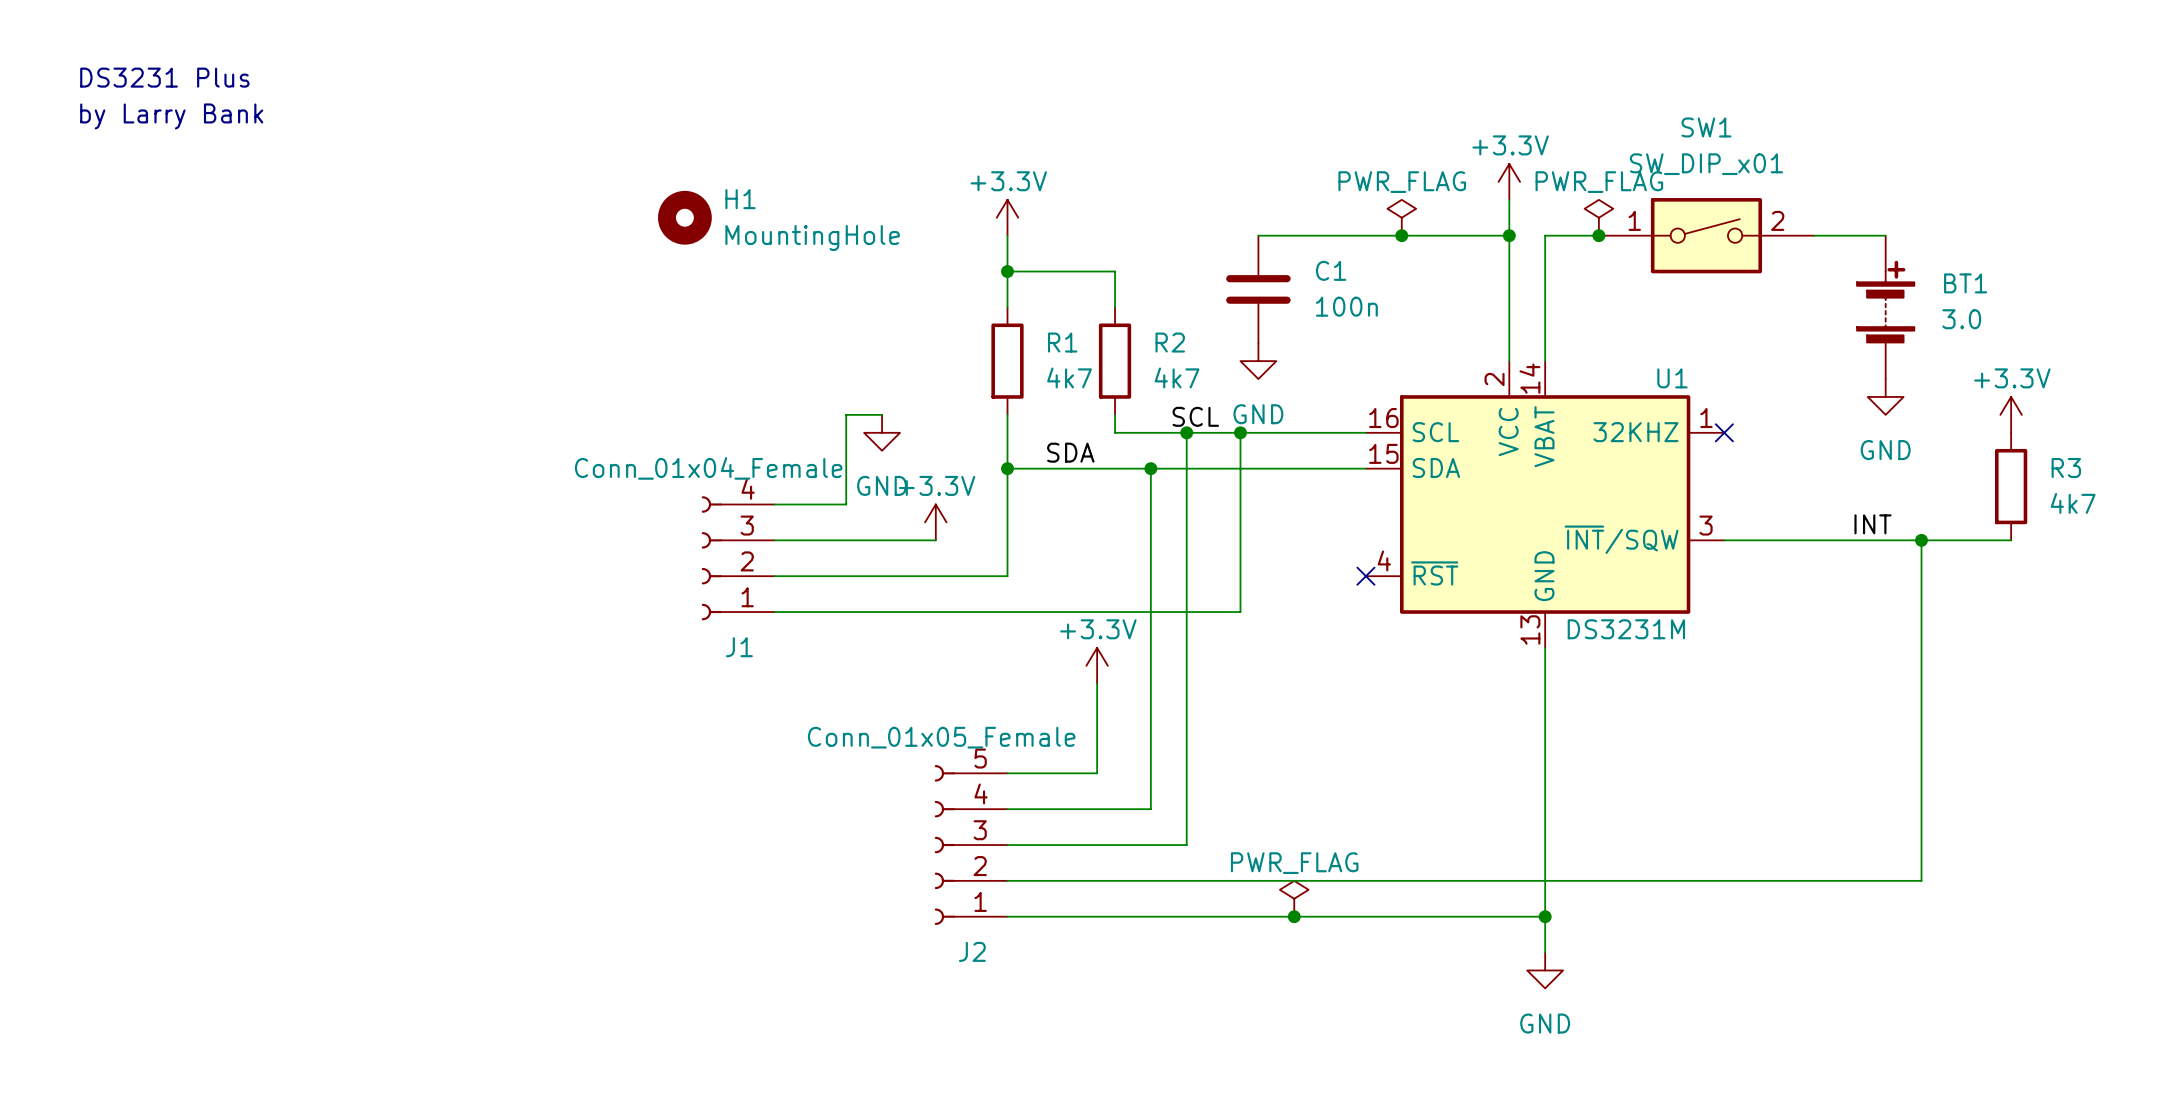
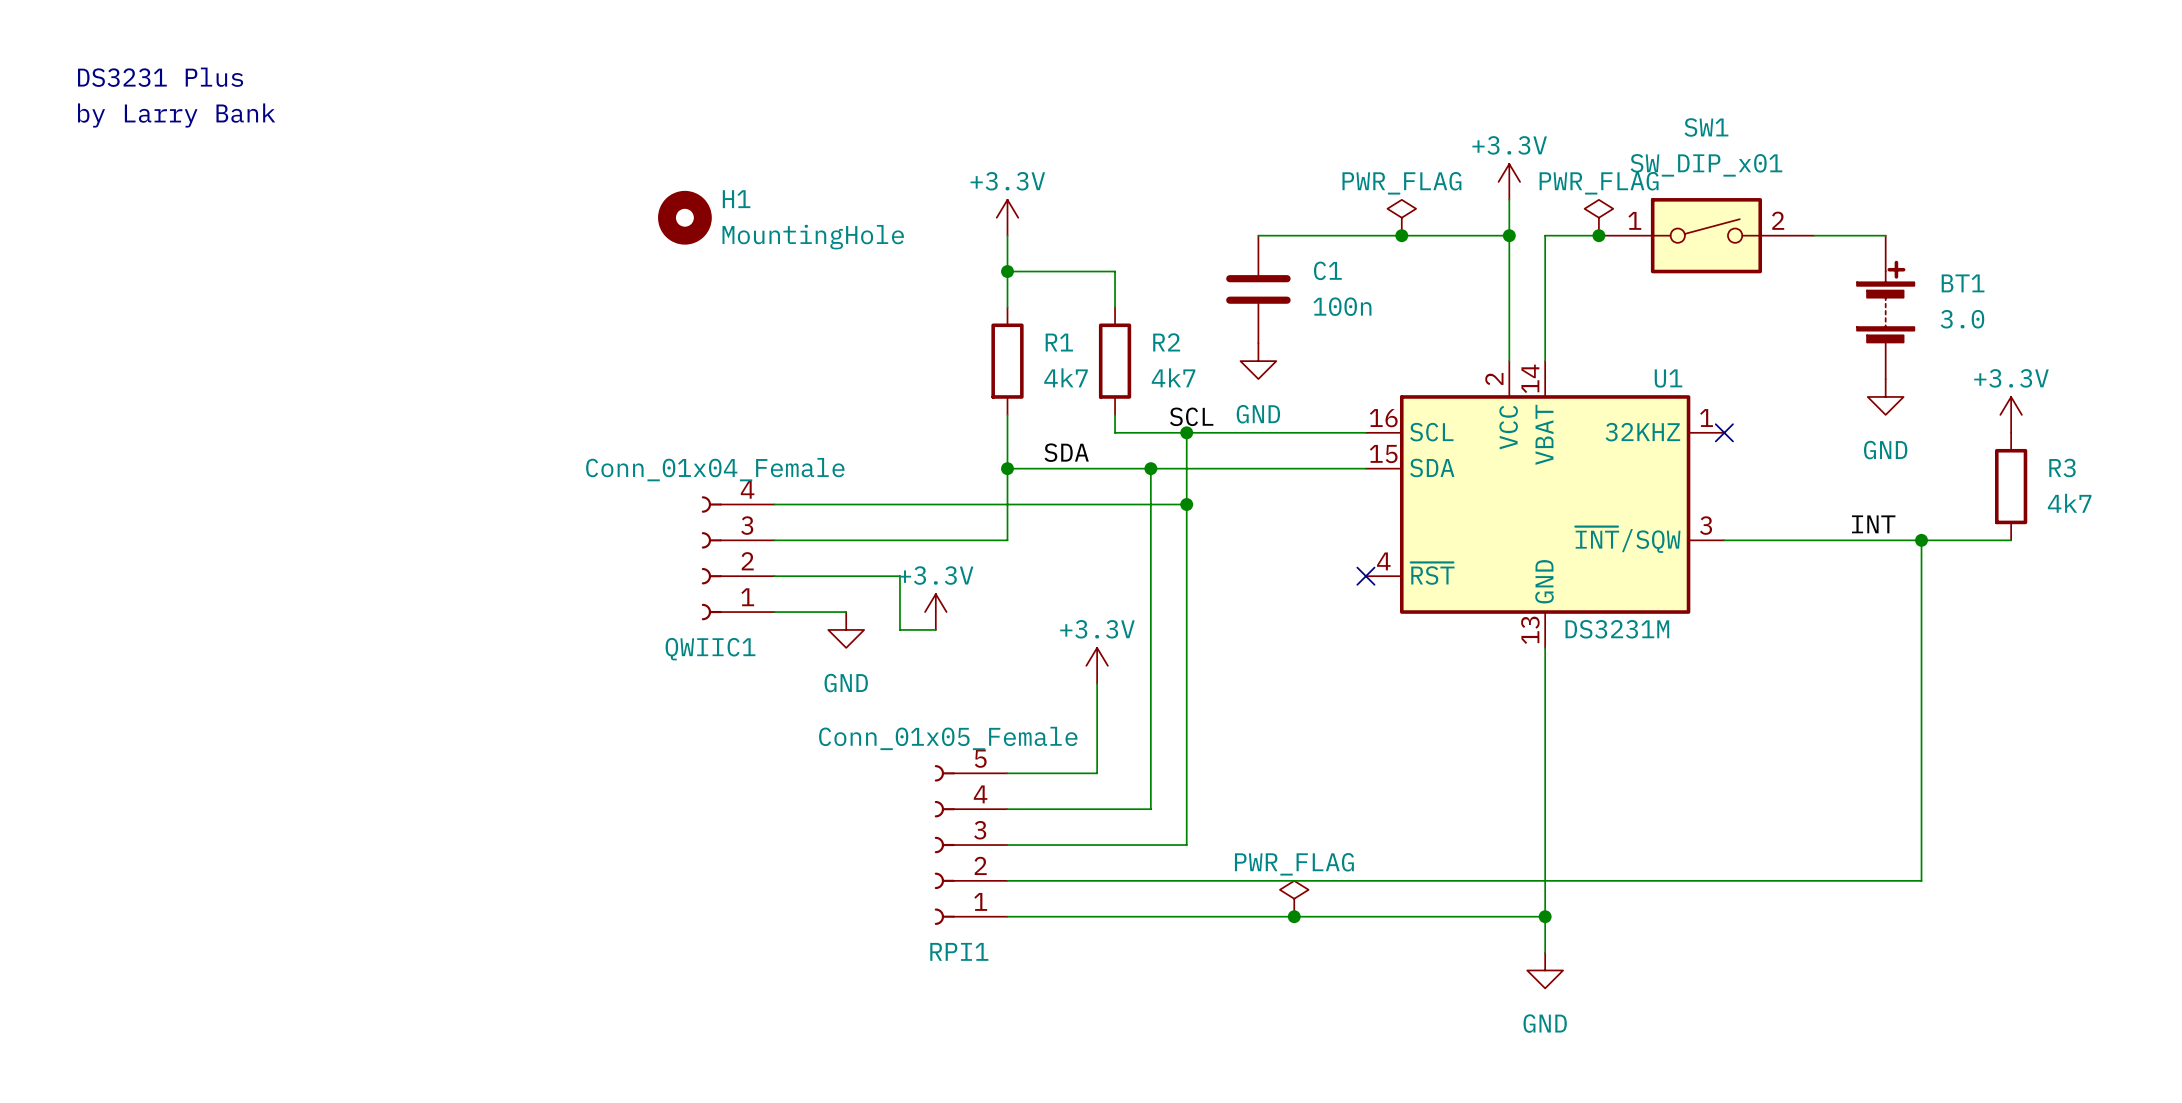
wire: (882, 414) (846, 414) (846, 504) -> (1186, 504) (846, 504)
power symbol position: GND (882, 432) -> GND (846, 629)
wire: (1240, 432) (1240, 612) (846, 612) -> none
junction: (1240, 432) -> none
junction: none -> (1186, 504)
power symbol position: +3.3V (935, 522) -> +3.3V (935, 612)
wire: (1007, 540) (1007, 576) (899, 576) -> (1007, 540) (935, 540)
wire: none -> (899, 576) (899, 629) (935, 629)
J1 name: J1 (739, 647) -> QWIIC1 (710, 649)
J2 name: J2 (972, 951) -> RPI1 (959, 951)

